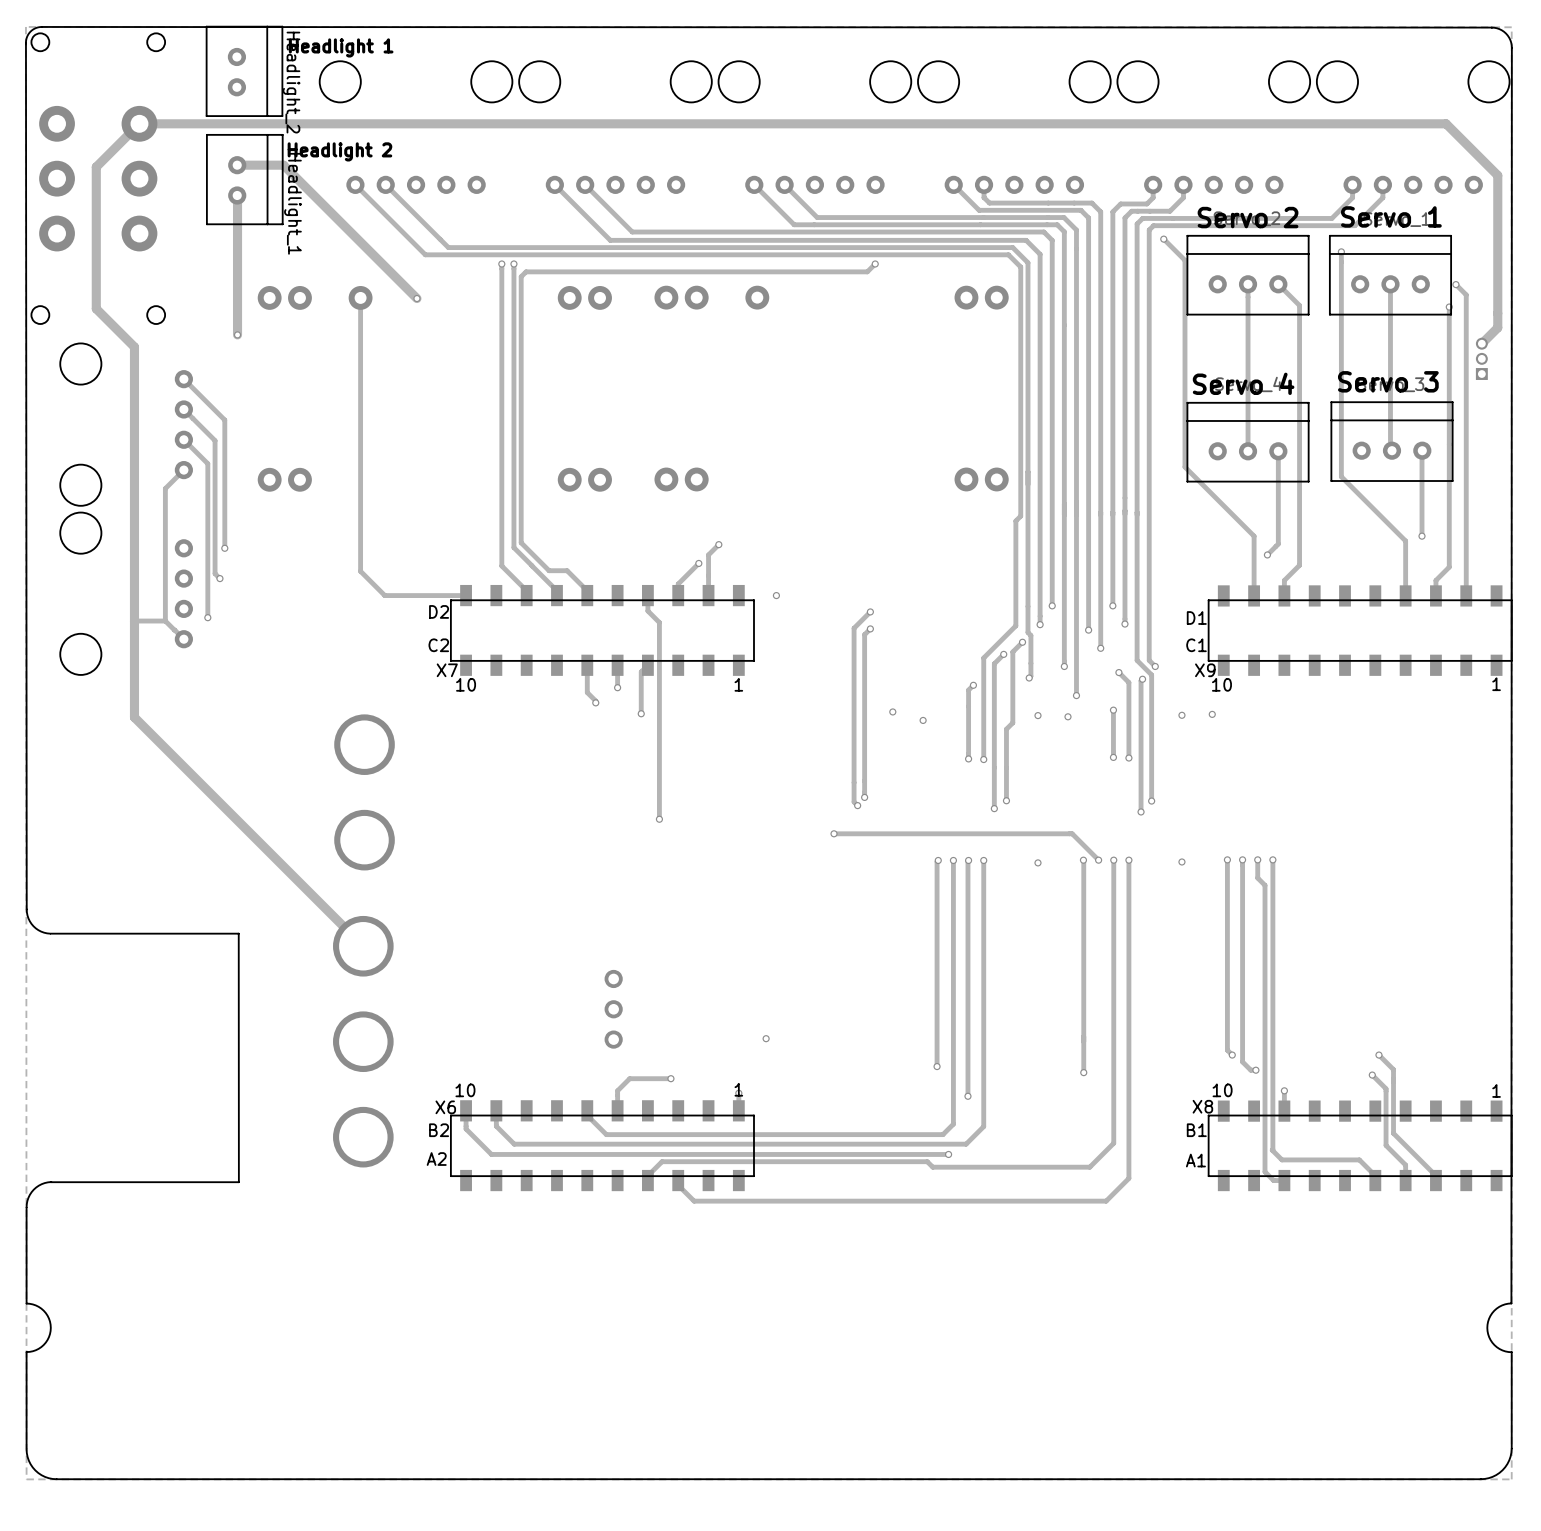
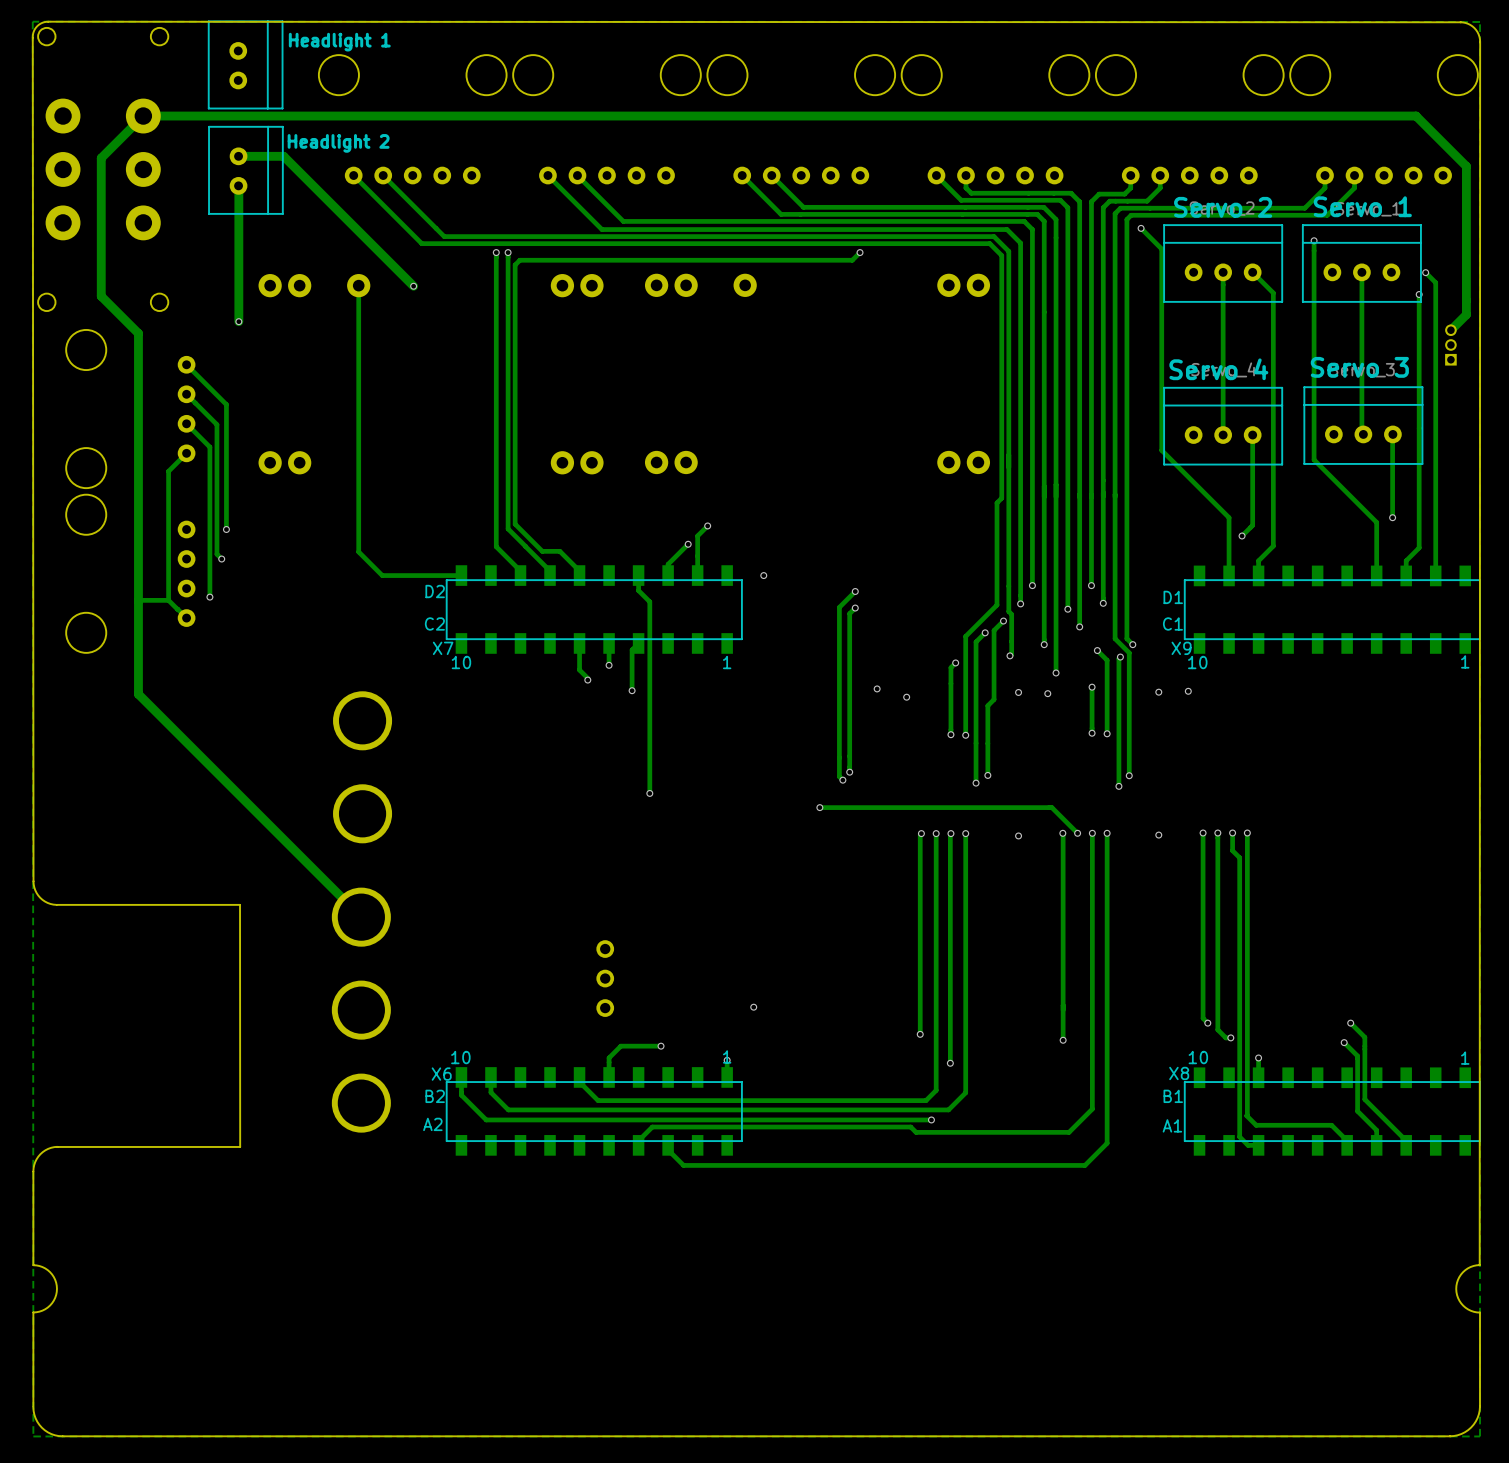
part value: Headlight_2 (291, 82) -> none
part value: Headlight_1 (292, 203) -> none

